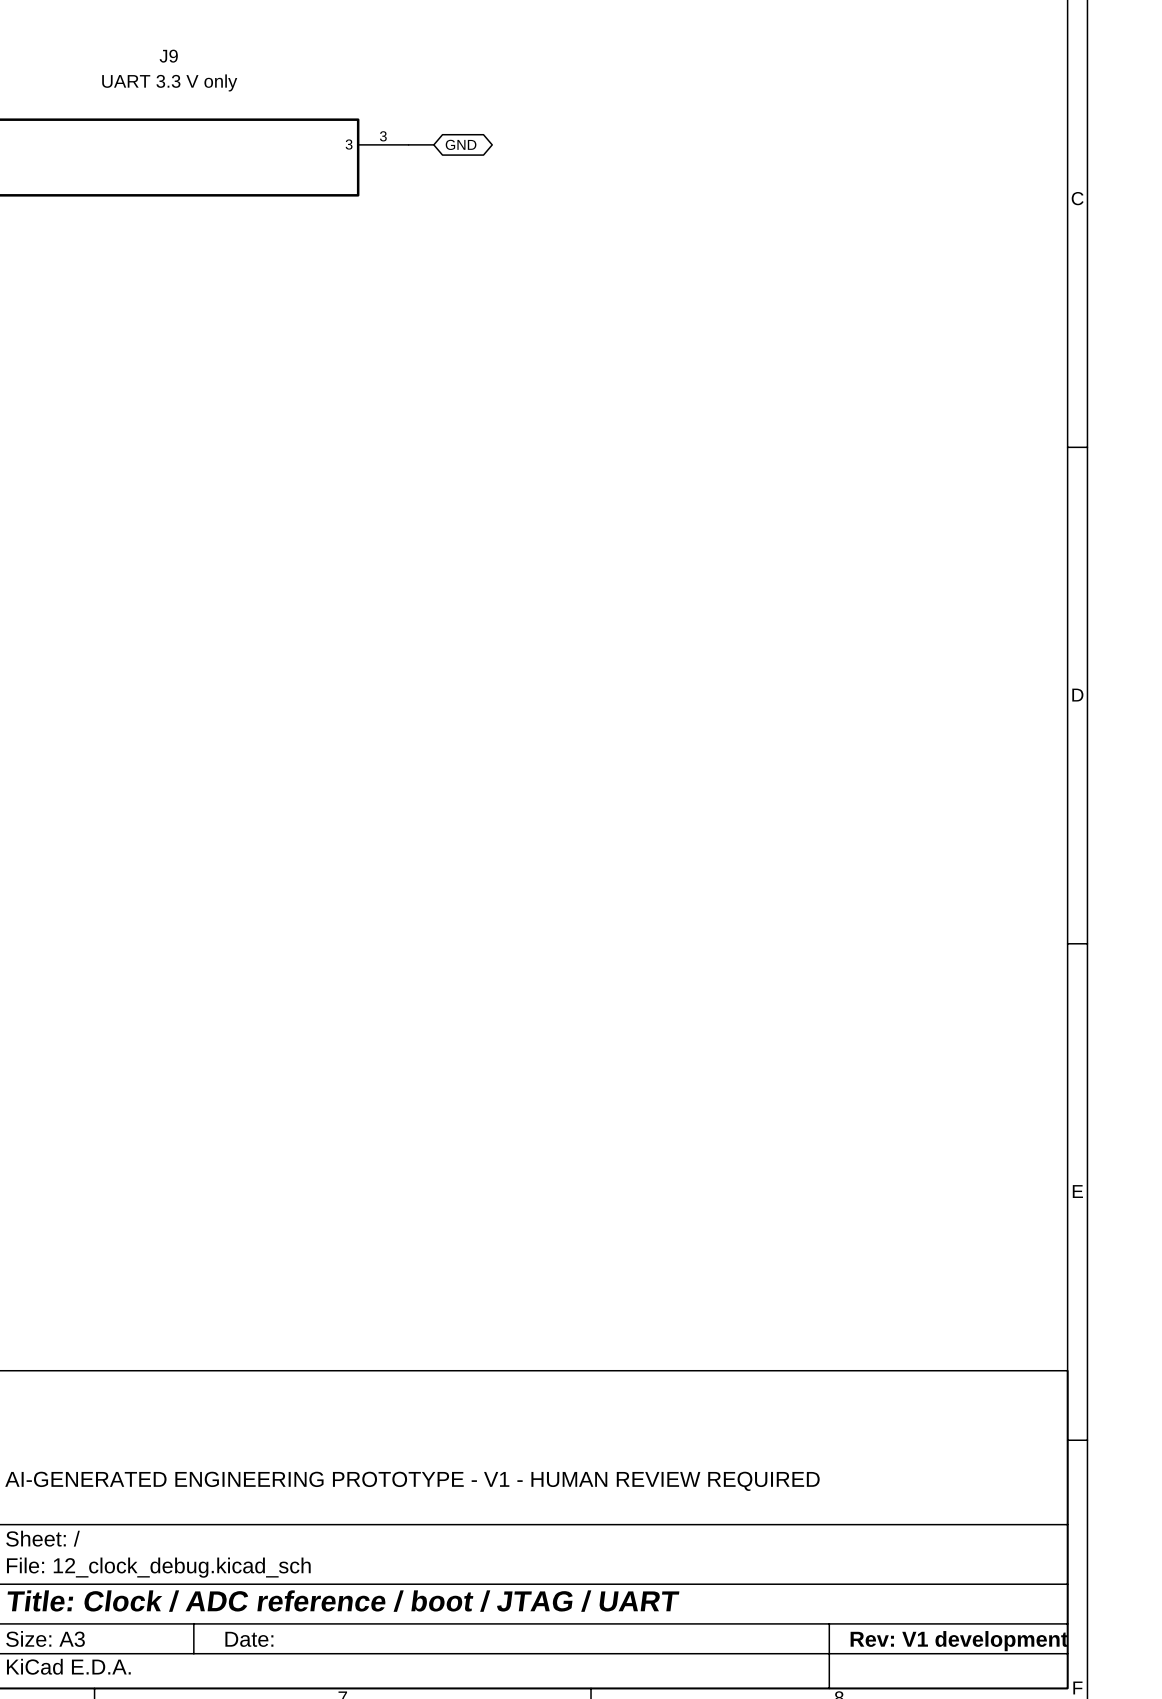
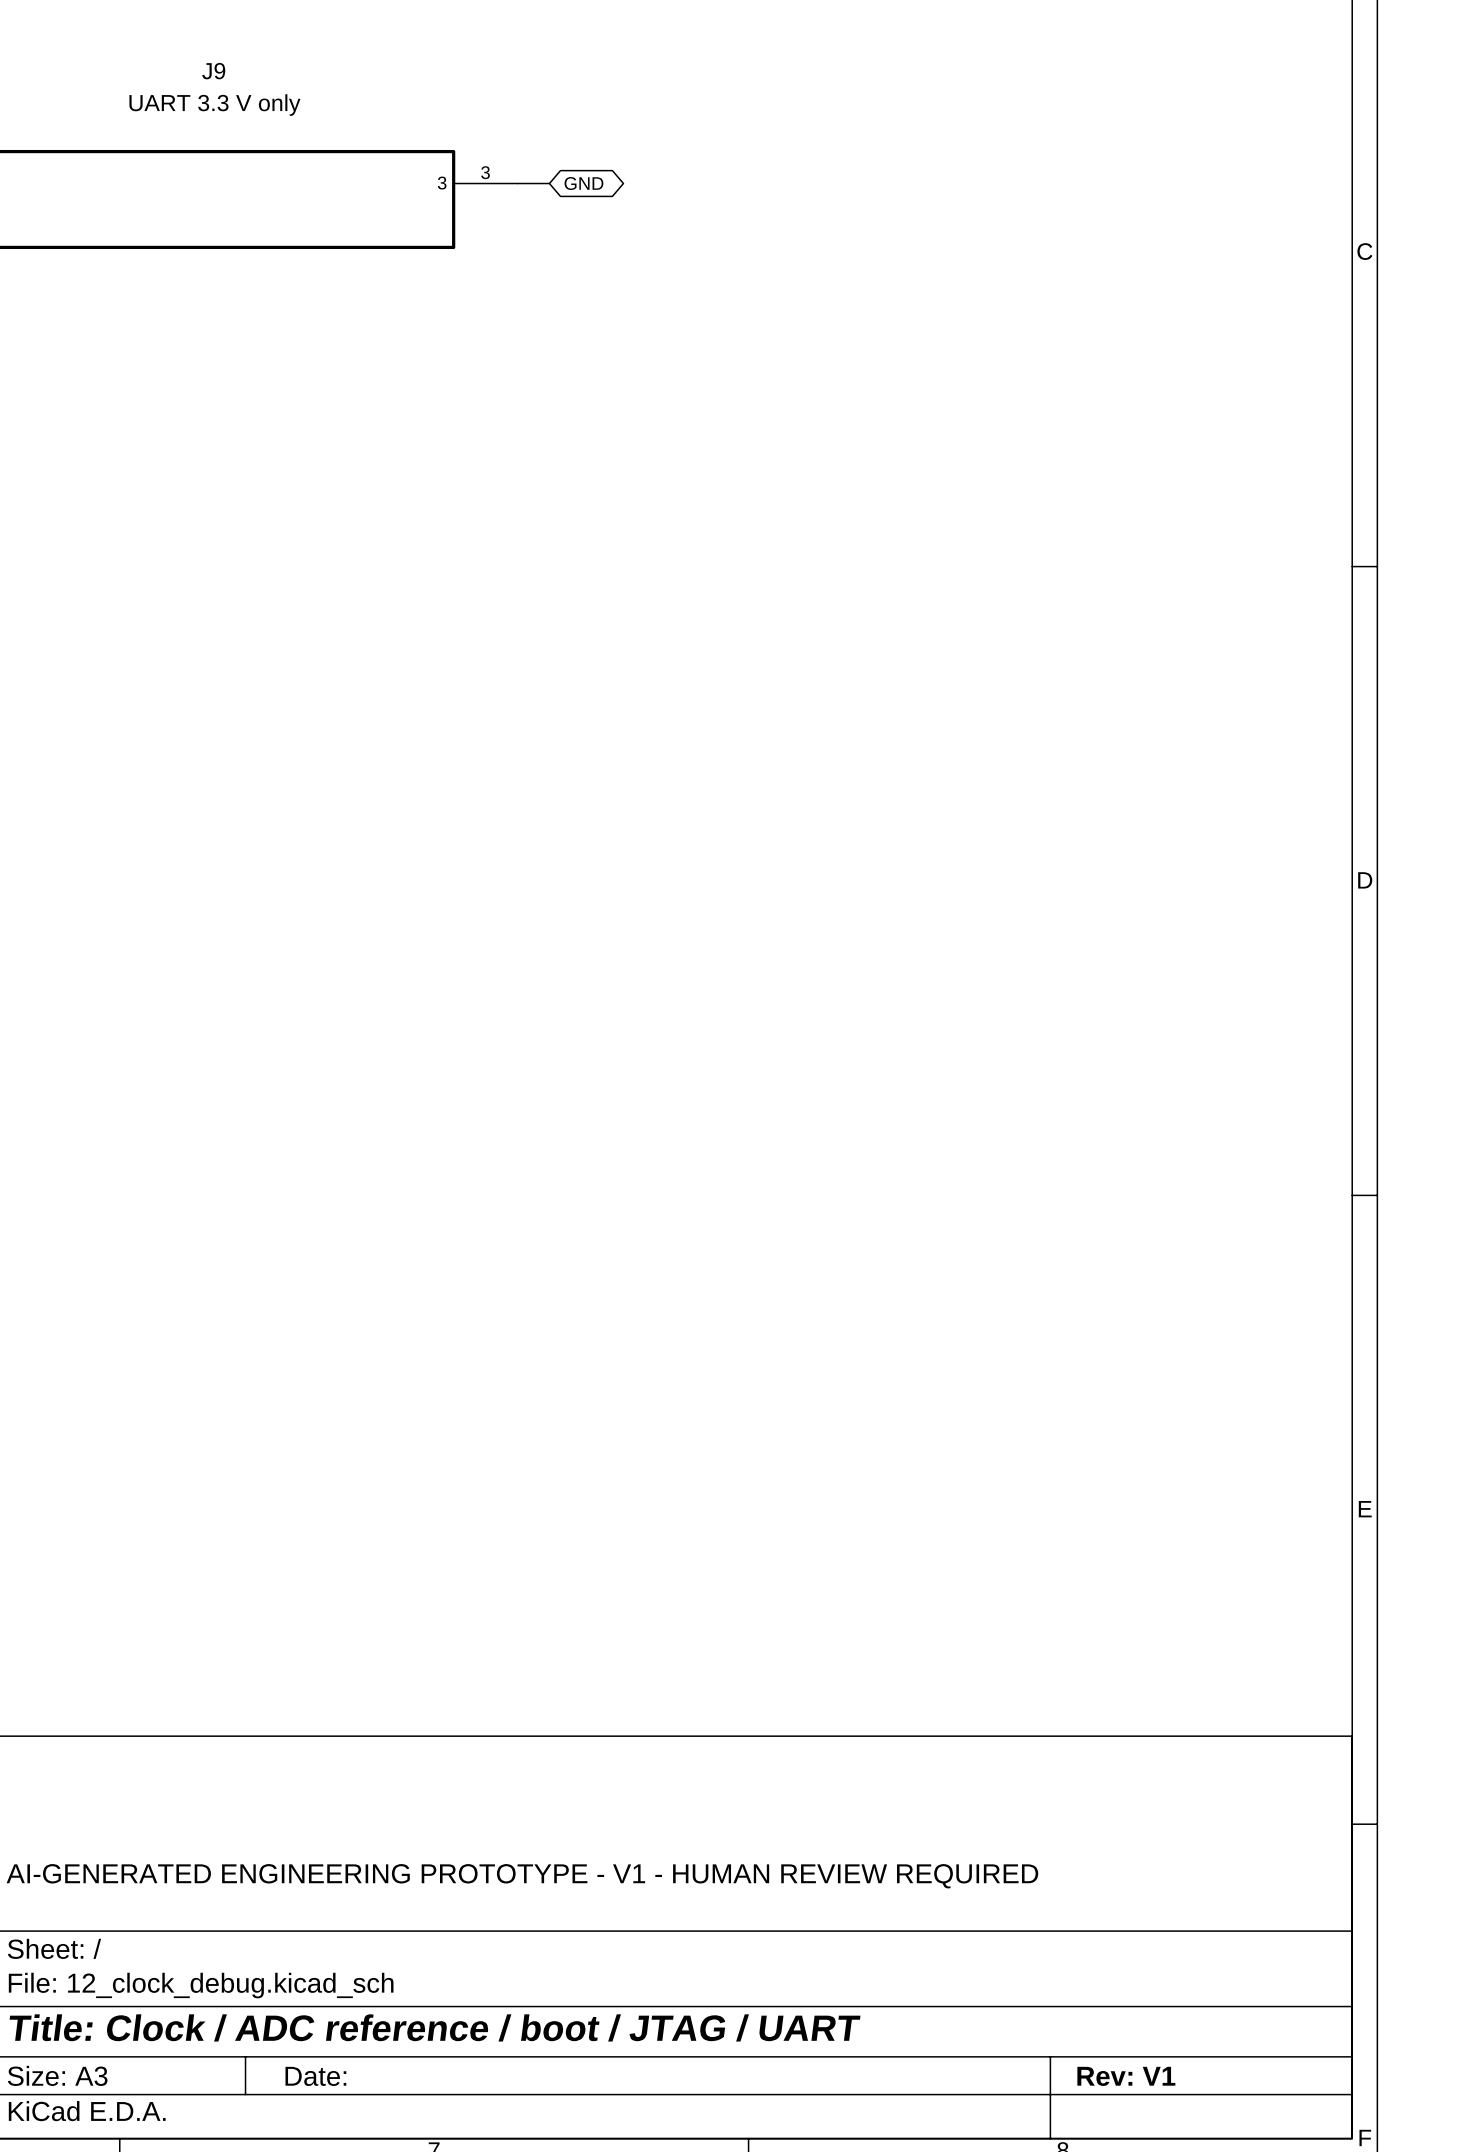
title block: Rev: V1 development (959, 1641) -> Rev: V1 (1126, 2076)

